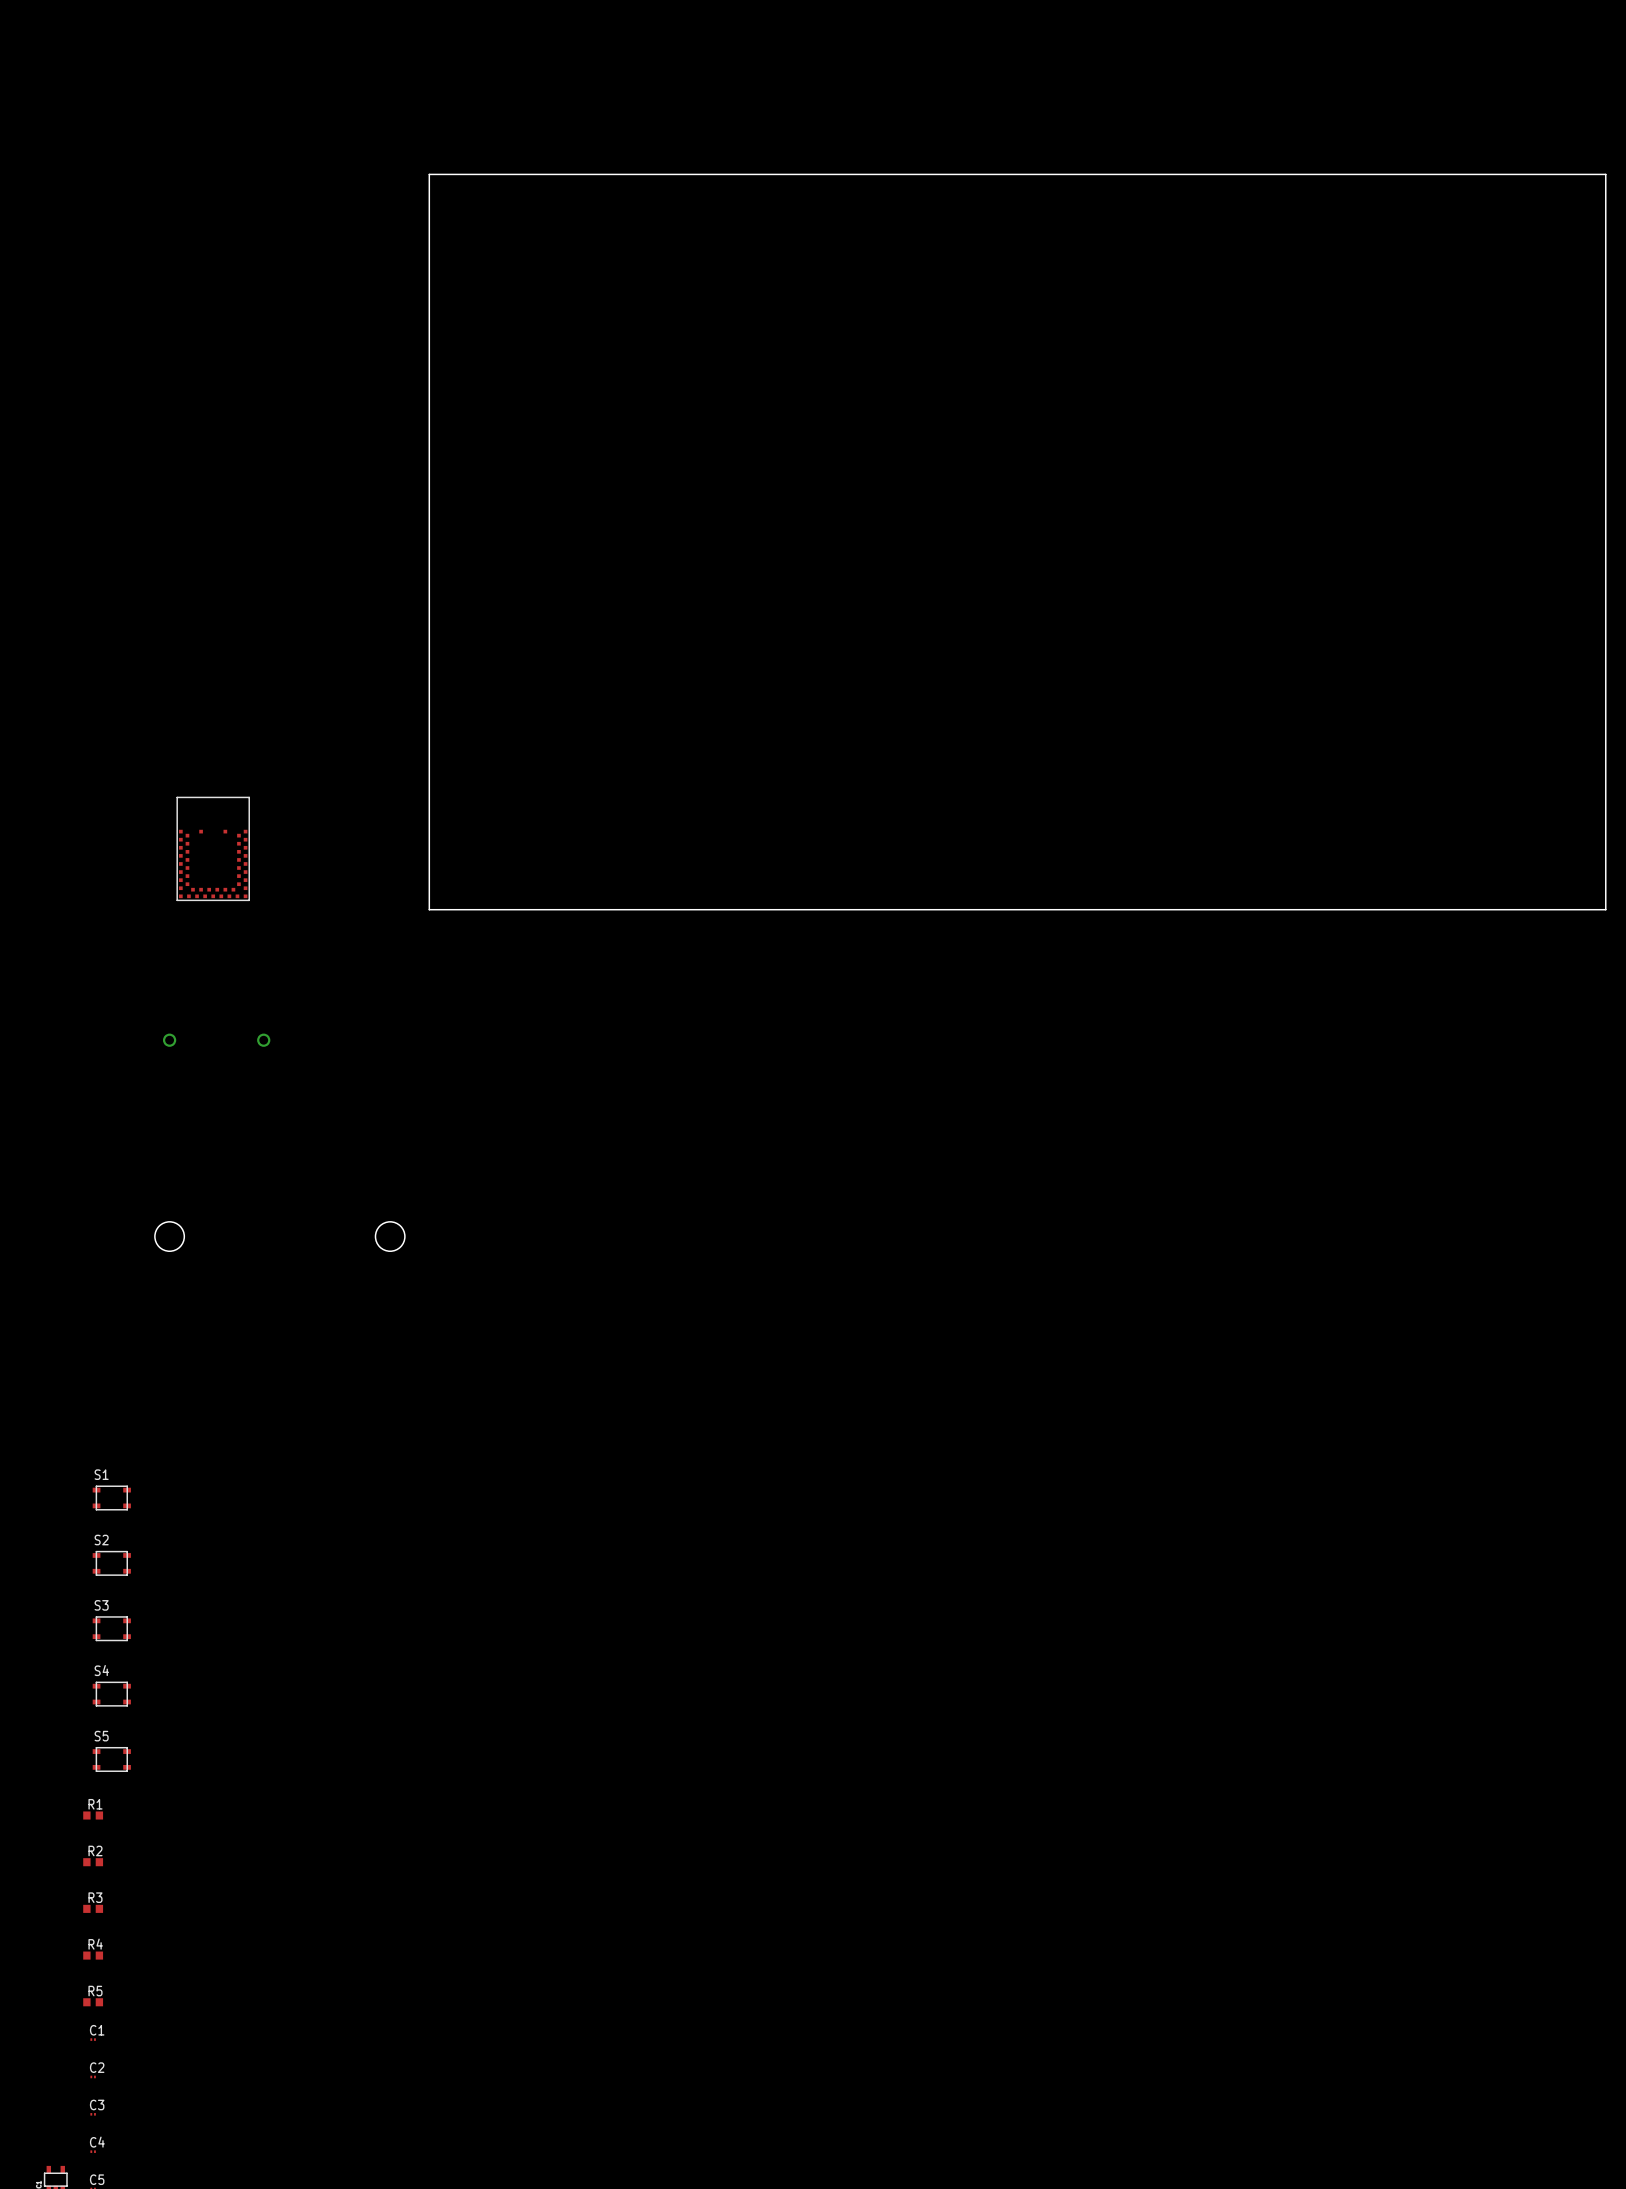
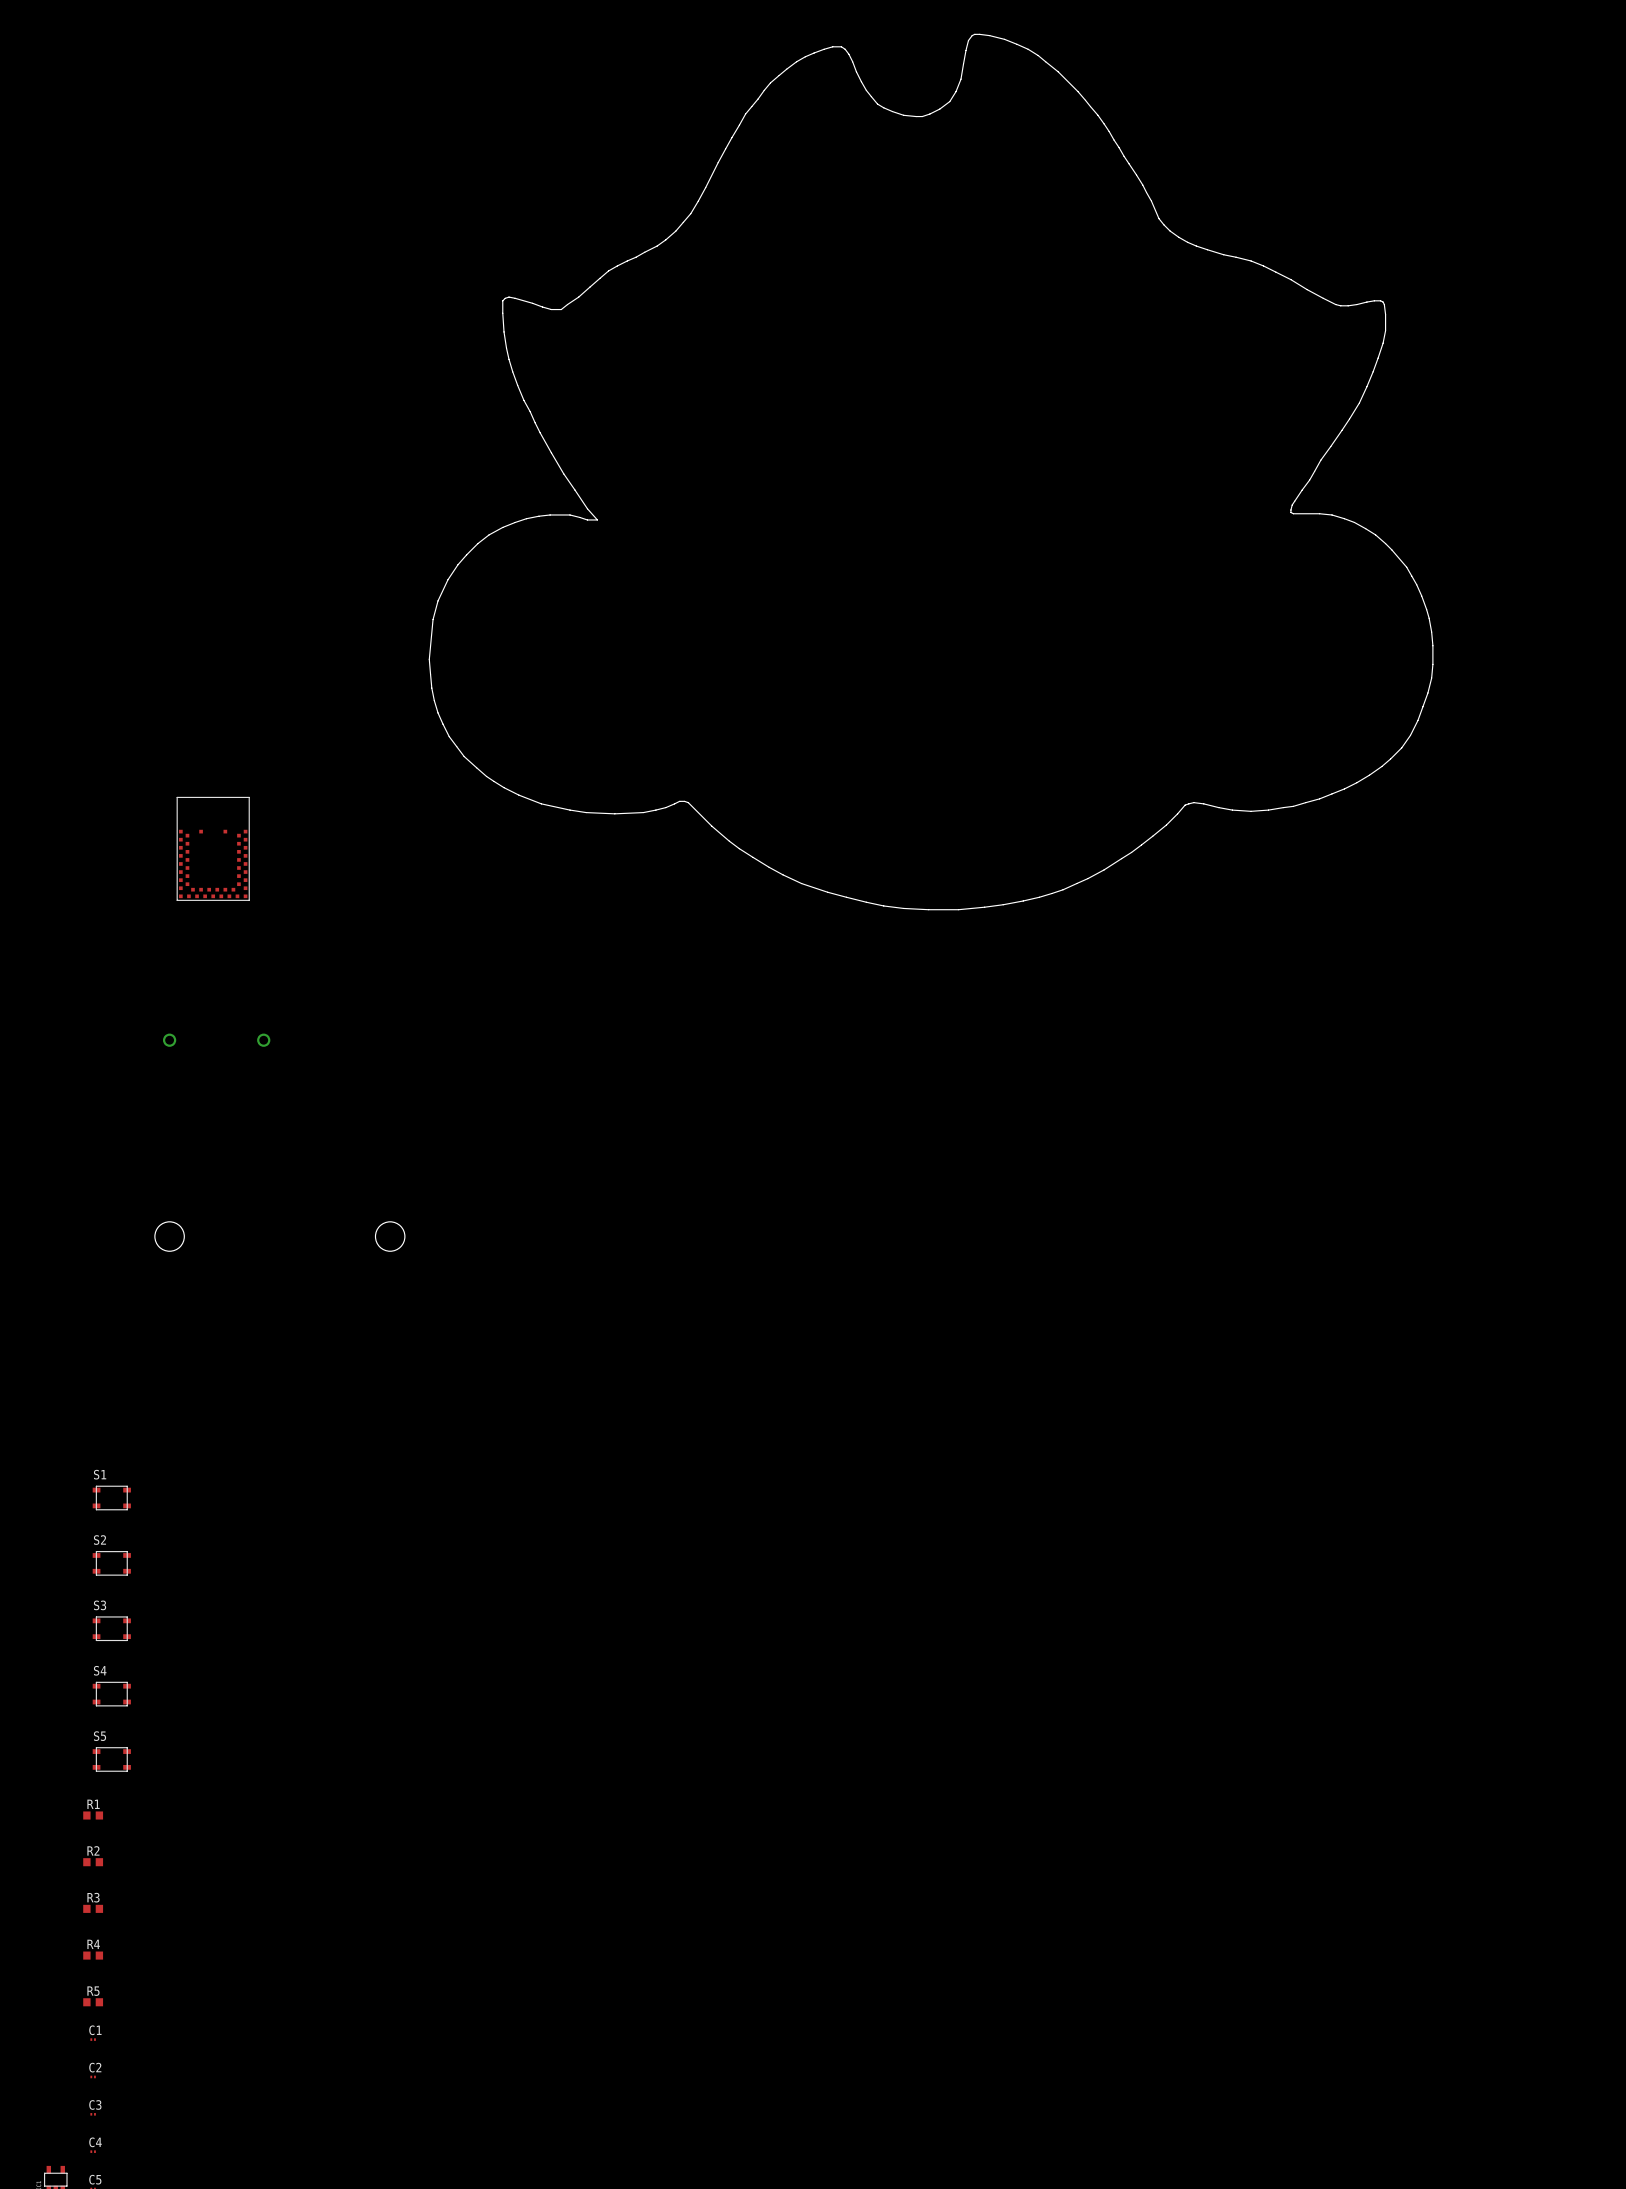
board edge: (928, 909) (429, 909) (429, 174) (1605, 174) (1605, 909) (958, 909) -> (928, 909) (883, 905) (827, 892) (801, 883) (769, 867) (739, 848) (684, 801) (643, 812) (586, 812) (541, 803) (504, 787) (486, 776) (464, 756) (449, 736) (434, 700) (429, 659) (433, 619) (438, 600) (447, 579) (457, 564) (477, 543) (502, 527) (538, 516) (570, 514) (587, 519) (597, 519) (563, 473) (523, 400) (512, 371) (506, 348) (502, 300) (509, 297) (551, 309) (561, 309) (608, 270) (665, 239) (690, 213) (745, 114) (770, 82) (805, 56) (832, 46) (841, 46) (848, 54) (866, 90) (877, 104) (903, 115) (922, 116) (939, 109) (949, 101) (960, 79) (968, 40) (972, 35) (979, 34) (1004, 39) (1028, 49) (1058, 71) (1078, 91) (1109, 131) (1142, 185) (1158, 218) (1178, 237) (1196, 246) (1263, 265) (1335, 304) (1348, 305) (1374, 300) (1383, 302) (1385, 330) (1378, 358) (1366, 386) (1349, 419) (1292, 505) (1290, 512) (1332, 514) (1344, 518) (1375, 534) (1391, 549) (1406, 567) (1416, 584) (1426, 609) (1431, 632) (1432, 664) (1427, 693) (1410, 735) (1390, 759) (1356, 782) (1319, 798) (1293, 806) (1268, 810) (1232, 810) (1203, 803) (1188, 803) (1185, 805) (1166, 825) (1131, 852) (1087, 878) (1063, 889) (1039, 897) (1003, 904) (958, 909)

